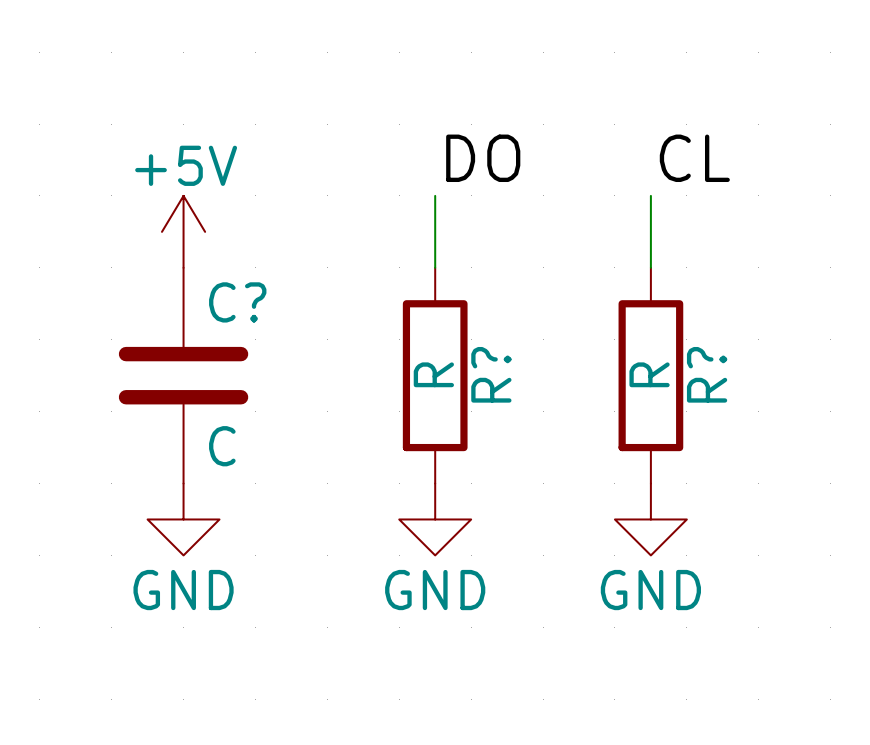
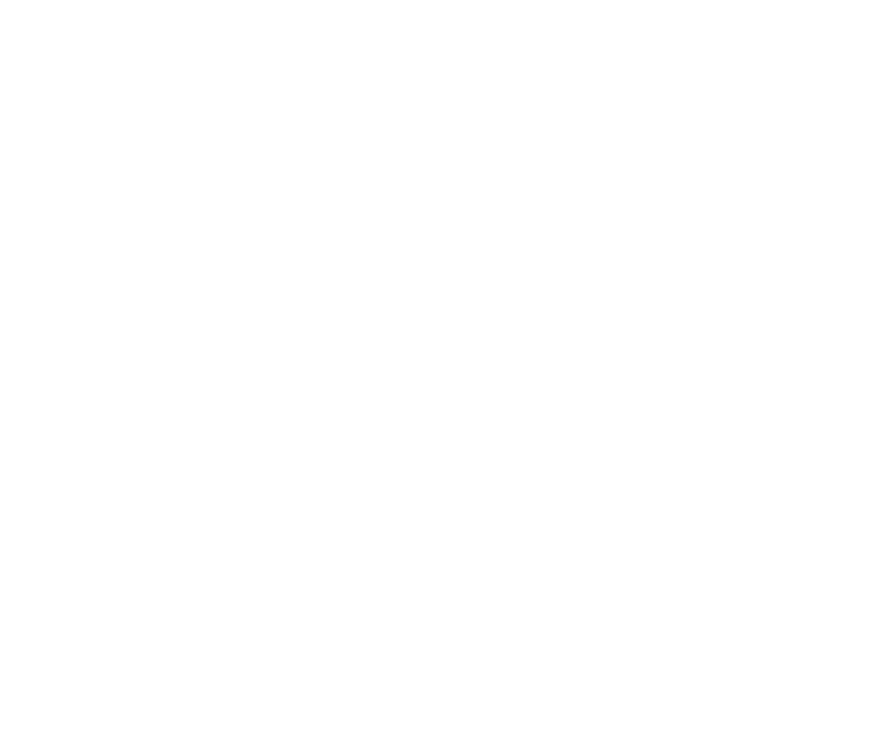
label: DO (483, 158) -> none
label: CL (694, 158) -> none
wire: (435, 195) (435, 267) -> none
wire: (650, 195) (650, 267) -> none
power symbol: +5V (183, 231) -> none
C?: C (183, 375) -> none
R?: R (435, 375) -> none
R?: R (650, 375) -> none
power symbol: GND (183, 519) -> none
power symbol: GND (435, 519) -> none
power symbol: GND (650, 519) -> none

